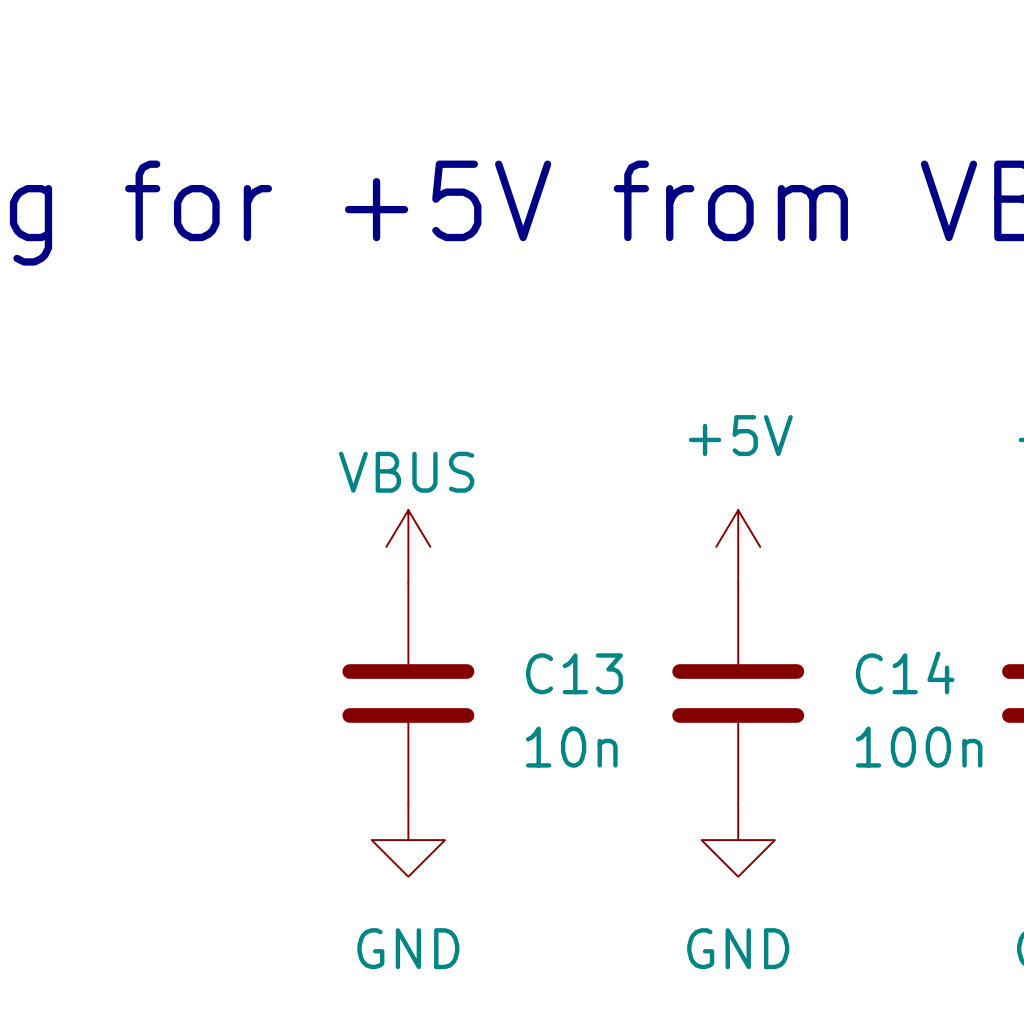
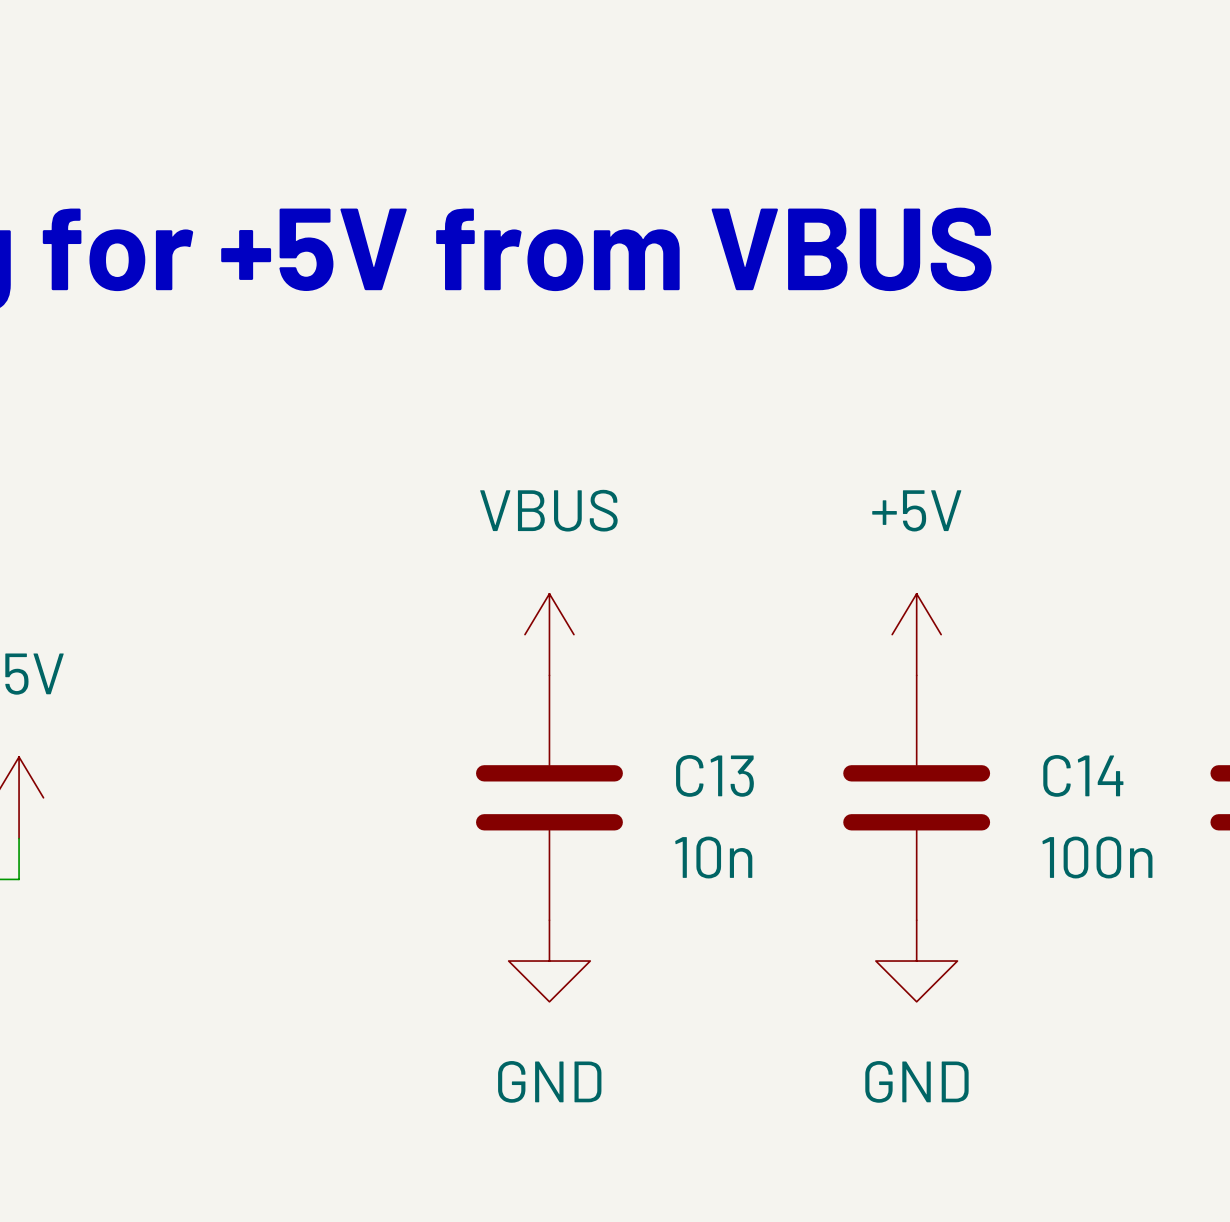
power symbol text position: VBUS (406, 472) -> VBUS (548, 510)

